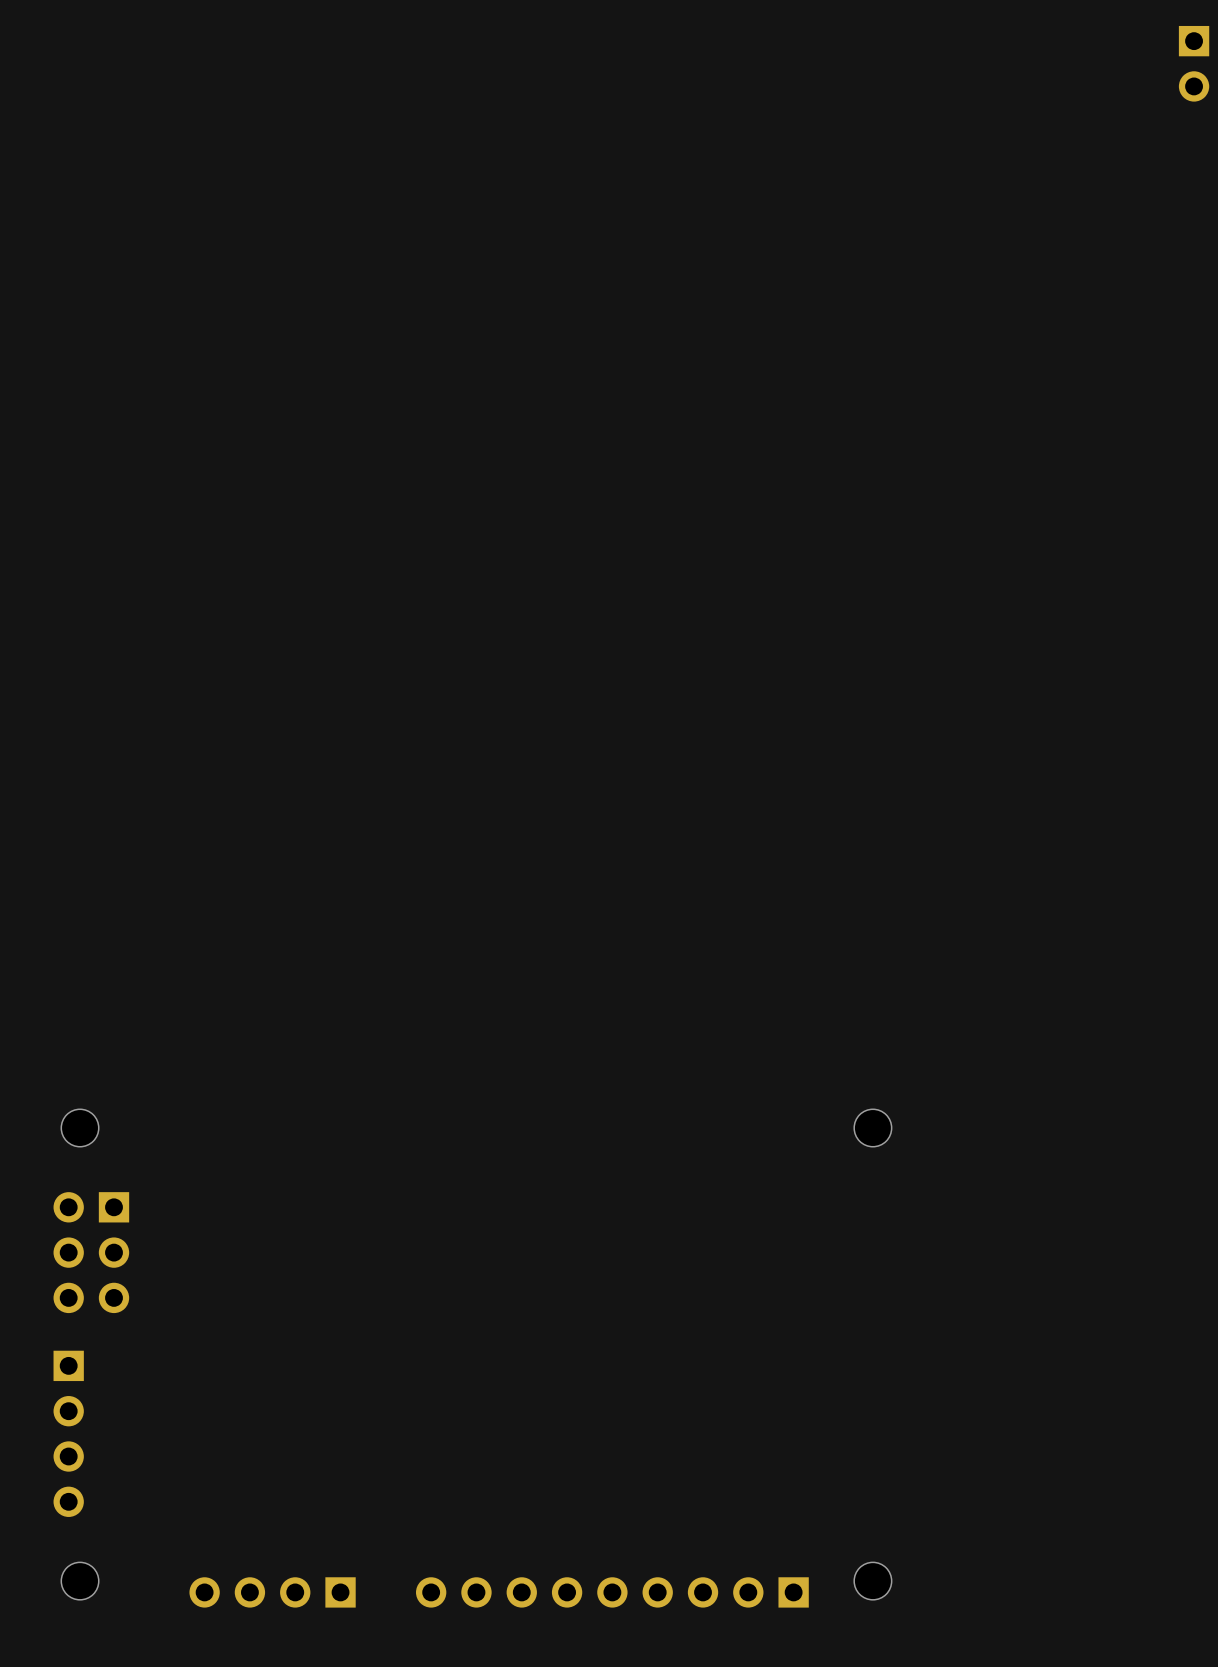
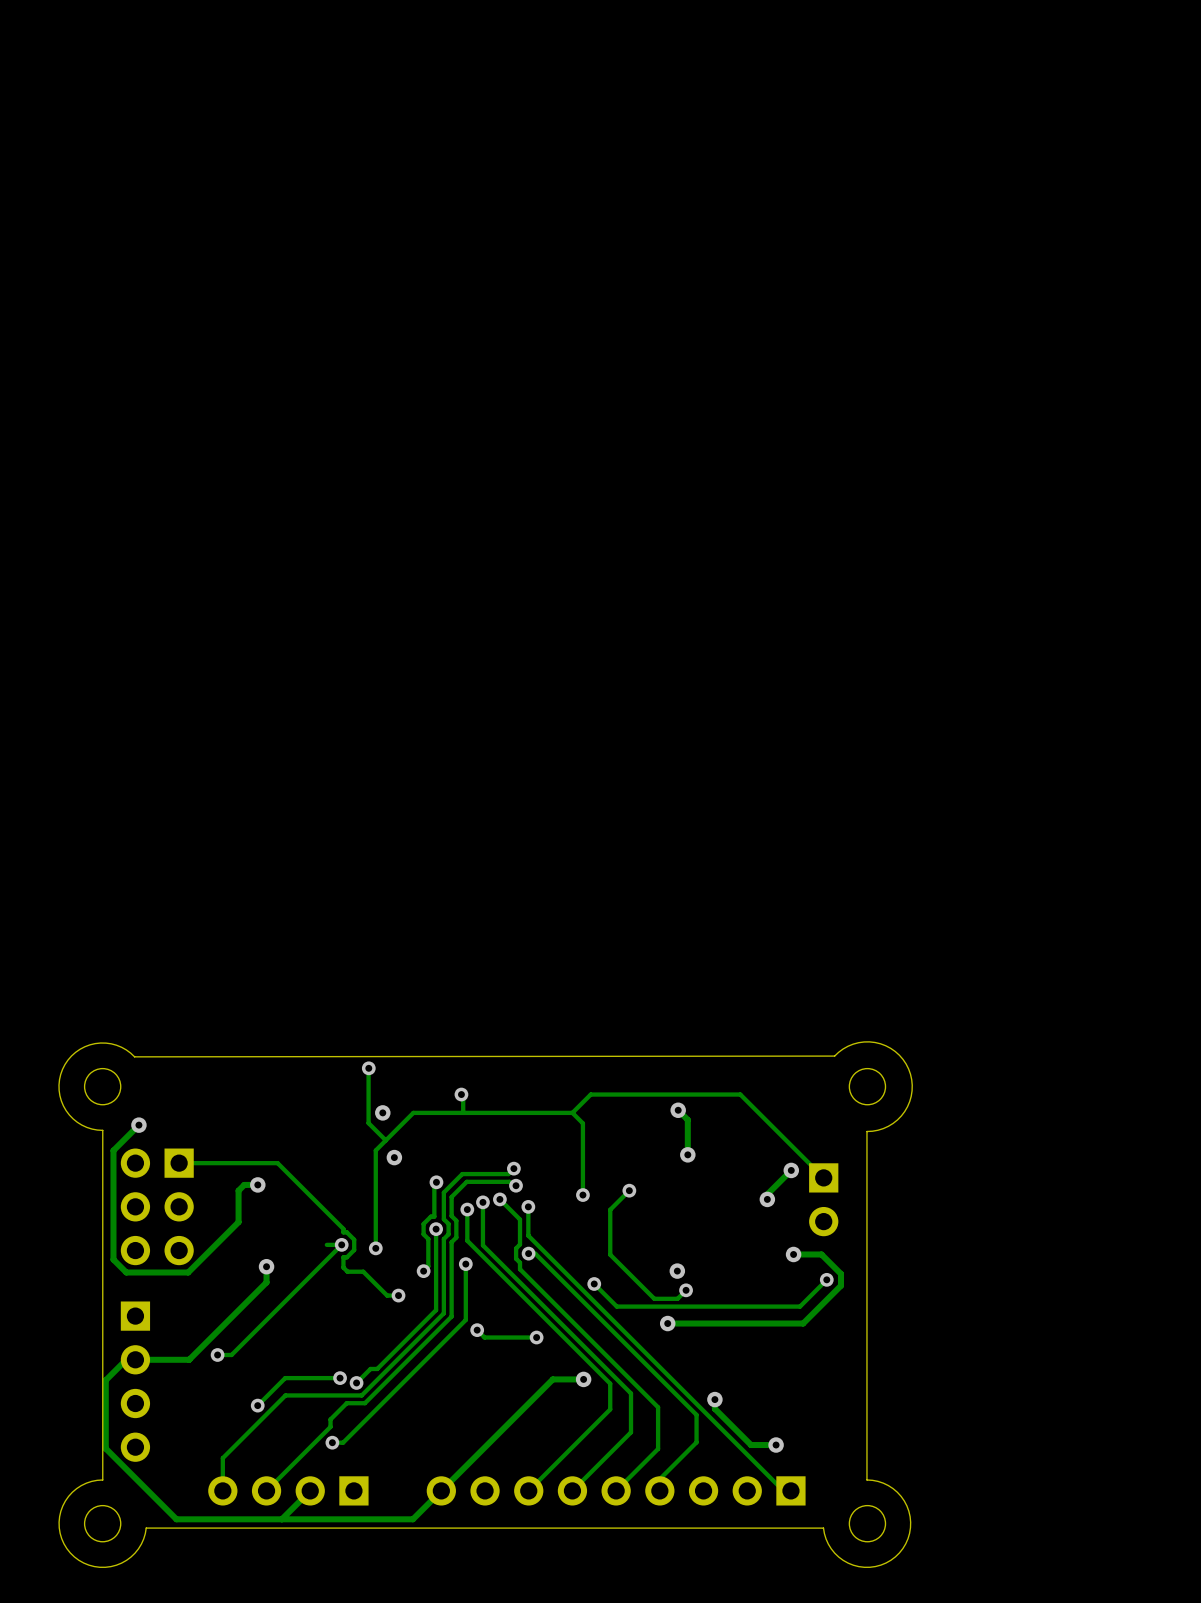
part: (1194, 63) -> none
board edge: none -> (834, 1056) (134, 1056) (126, 1049) (111, 1043) (95, 1043) (80, 1049) (65, 1064) (60, 1074) (59, 1090) (63, 1106) (73, 1118) (86, 1127) (102, 1130) (102, 1479) (81, 1485) (72, 1492) (62, 1505) (59, 1527) (66, 1548) (83, 1563) (105, 1567) (121, 1563) (134, 1553) (143, 1538) (146, 1528) (823, 1528) (831, 1548) (848, 1563) (869, 1567) (890, 1560) (905, 1543) (910, 1522) (906, 1505) (897, 1492) (883, 1483) (866, 1479) (866, 1131) (888, 1126) (901, 1115) (909, 1101) (911, 1079) (903, 1059) (890, 1048) (880, 1043) (858, 1042) (848, 1046) (834, 1056)
via: none -> (368, 1068)
track: none -> (368, 1068) (368, 1123) (385, 1140)
track: none -> (461, 1094) (463, 1096) (463, 1112)
via: none -> (461, 1094)
track: none -> (678, 1110) (687, 1119) (687, 1154)
via: none -> (678, 1110)
via: none -> (382, 1112)
track: none -> (572, 1112) (590, 1094) (740, 1094) (823, 1177)
track: none -> (572, 1112) (582, 1123) (582, 1195)
track: none -> (572, 1112) (413, 1112) (375, 1150) (375, 1248)
track: none -> (138, 1125) (113, 1150) (113, 1259) (126, 1272) (188, 1272) (238, 1222) (238, 1190) (244, 1184) (257, 1184)
via: none -> (138, 1125)
via: none -> (687, 1154)
via: none -> (394, 1157)
track: none -> (179, 1163) (277, 1163) (343, 1228) (343, 1232) (346, 1232) (354, 1239) (354, 1250) (346, 1257) (343, 1257) (343, 1267) (347, 1271) (363, 1271) (387, 1295) (398, 1295)
track: none -> (513, 1168) (508, 1174) (462, 1174) (443, 1192) (443, 1219) (448, 1223) (448, 1234) (443, 1239) (443, 1313) (361, 1395) (285, 1395) (222, 1458) (222, 1490)
via: none -> (513, 1168)
track: none -> (791, 1170) (767, 1194) (767, 1199)
via: none -> (791, 1170)
track: none -> (436, 1182) (434, 1184) (434, 1216) (430, 1216) (423, 1223) (423, 1234) (428, 1239) (428, 1266) (423, 1271)
via: none -> (436, 1182)
via: none -> (257, 1184)
track: none -> (516, 1185) (514, 1187) (509, 1181) (466, 1181) (451, 1197) (451, 1216) (456, 1220) (456, 1237) (451, 1242) (451, 1316) (364, 1403) (346, 1403) (330, 1419) (330, 1426) (266, 1490)
via: none -> (516, 1185)
track: none -> (629, 1190) (610, 1209) (610, 1254) (654, 1298) (677, 1298) (686, 1290)
via: none -> (629, 1190)
via: none -> (582, 1195)
track: none -> (499, 1199) (520, 1219) (520, 1244) (516, 1248) (516, 1258) (520, 1262) (520, 1269) (658, 1407) (658, 1448) (616, 1490)
via: none -> (499, 1199)
via: none -> (767, 1199)
part: none -> (823, 1199)
track: none -> (482, 1202) (482, 1245) (631, 1393) (631, 1432) (572, 1490)
via: none -> (482, 1202)
part position: (91, 1252) -> (157, 1206)
track: none -> (528, 1206) (528, 1235)
via: none -> (528, 1206)
track: none -> (467, 1209) (467, 1240) (610, 1383) (610, 1409) (528, 1490)
via: none -> (467, 1209)
track: none -> (436, 1229) (436, 1310) (377, 1368) (370, 1368) (356, 1382)
via: none -> (436, 1229)
track: none -> (528, 1235) (783, 1490) (790, 1490)
track: none -> (326, 1244) (341, 1244) (231, 1354) (217, 1354)
via: none -> (341, 1244)
via: none -> (375, 1248)
track: none -> (528, 1253) (535, 1253) (696, 1414) (696, 1442) (659, 1479) (659, 1490)
via: none -> (528, 1253)
track: none -> (793, 1254) (821, 1254) (841, 1273) (841, 1285) (803, 1323) (667, 1323)
via: none -> (793, 1254)
track: none -> (465, 1264) (465, 1319) (343, 1442) (332, 1442)
via: none -> (465, 1264)
track: none -> (265, 1266) (266, 1282) (189, 1359) (126, 1359) (105, 1380) (105, 1448) (176, 1519) (412, 1519) (552, 1379) (583, 1379)
via: none -> (266, 1266)
via: none -> (423, 1271)
via: none -> (677, 1271)
track: none -> (826, 1279) (800, 1306) (616, 1306) (594, 1283)
via: none -> (826, 1279)
via: none -> (594, 1283)
via: none -> (686, 1290)
via: none -> (398, 1295)
via: none -> (667, 1323)
track: none -> (477, 1330) (484, 1337) (536, 1337)
via: none -> (477, 1330)
via: none -> (536, 1337)
via: none -> (217, 1354)
track: none -> (340, 1378) (285, 1378) (257, 1405)
via: none -> (340, 1378)
via: none -> (583, 1379)
part position: (68, 1433) -> (135, 1381)
via: none -> (356, 1382)
track: none -> (714, 1399) (714, 1408) (751, 1445) (776, 1445)
via: none -> (714, 1399)
via: none -> (257, 1405)
via: none -> (332, 1442)
via: none -> (776, 1445)
track: none -> (310, 1490) (281, 1519)
part position: (272, 1592) -> (288, 1490)
part position: (612, 1592) -> (616, 1490)

